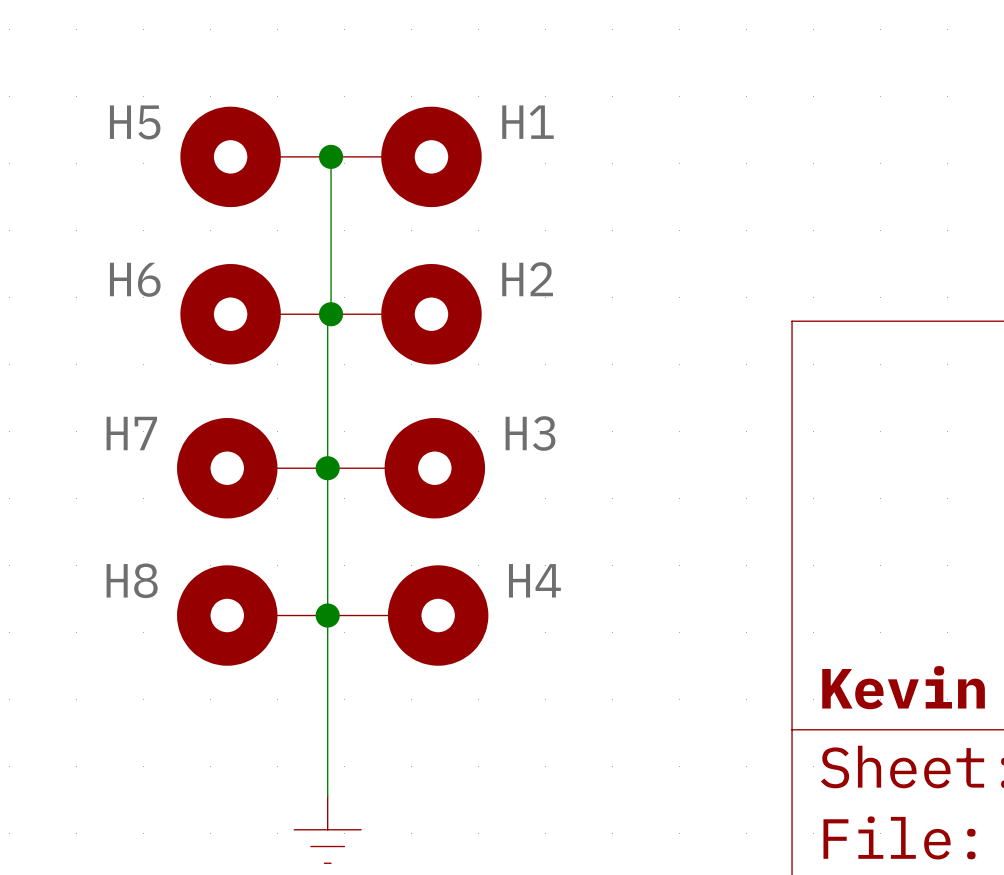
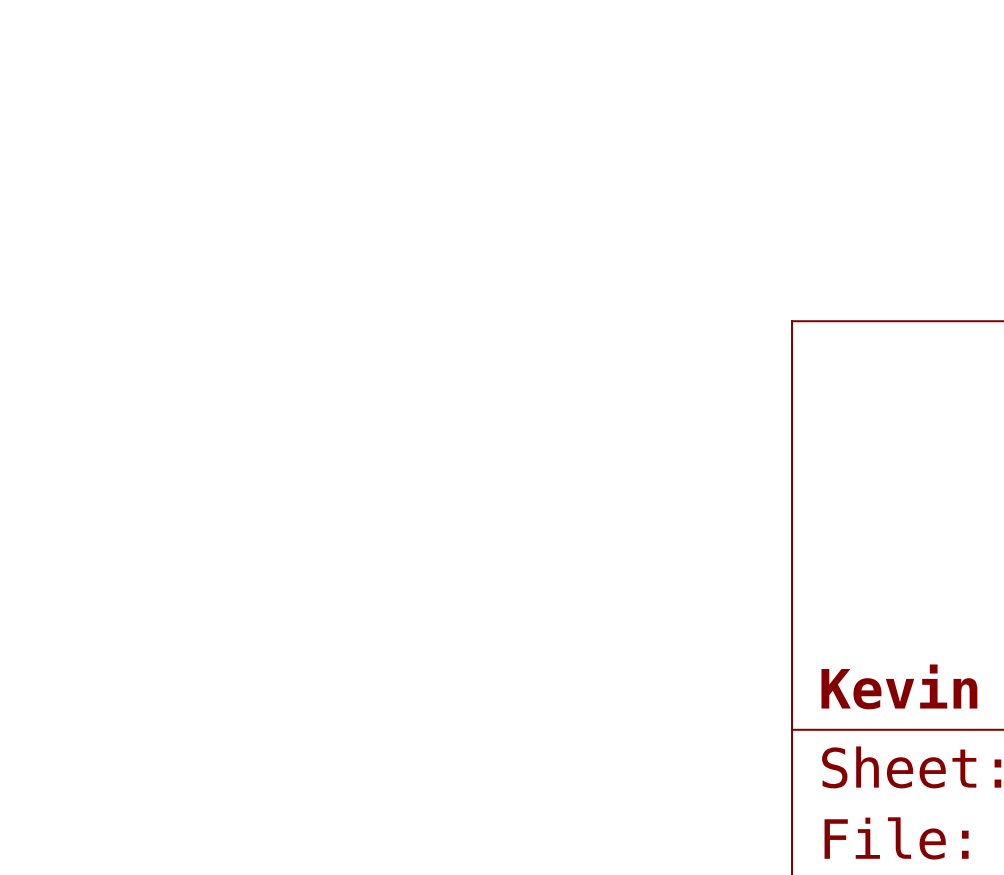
H5: (255, 156) -> none
wire: (331, 156) (331, 314) (327, 314) (327, 796) -> none
junction: (331, 156) -> none
H1: (406, 156) -> none
H6: (255, 314) -> none
junction: (331, 314) -> none
H2: (406, 314) -> none
H7: (252, 468) -> none
junction: (327, 468) -> none
H3: (409, 468) -> none
H8: (252, 615) -> none
junction: (327, 615) -> none
H4: (413, 615) -> none
power symbol: (327, 829) -> none

